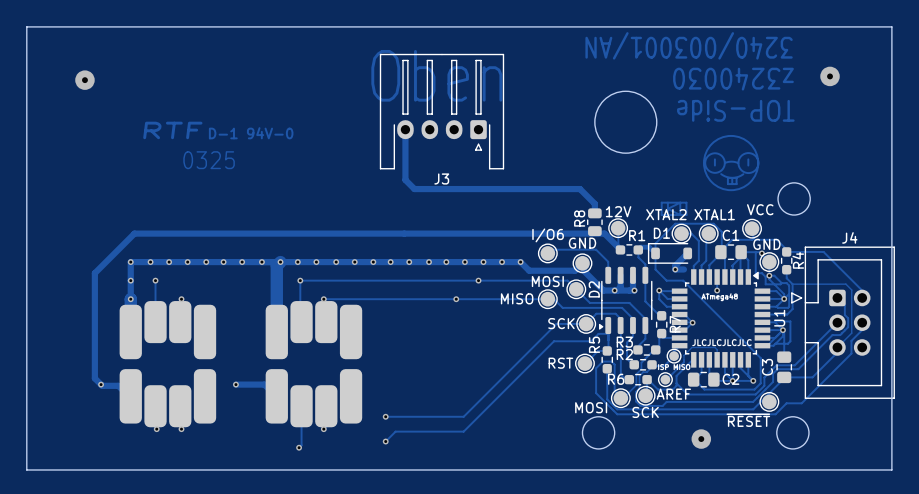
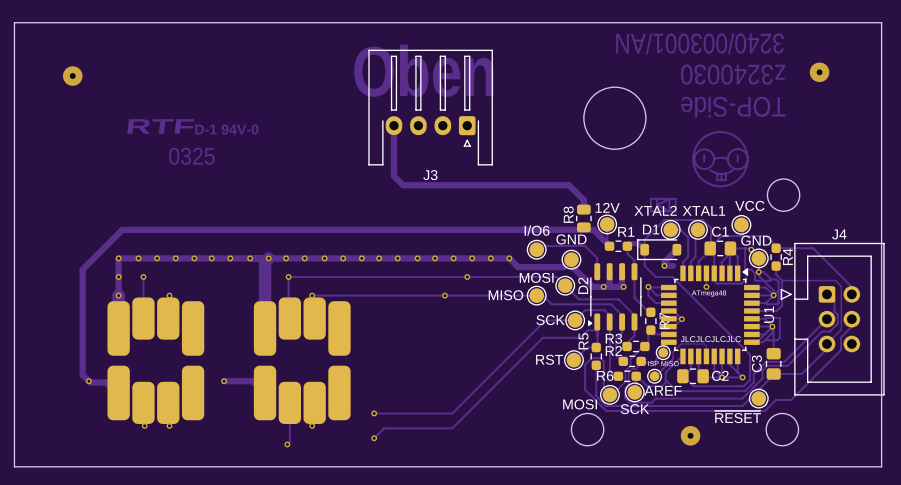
track: none -> (714, 273) (714, 280) (716, 283) (741, 283) (746, 277)

